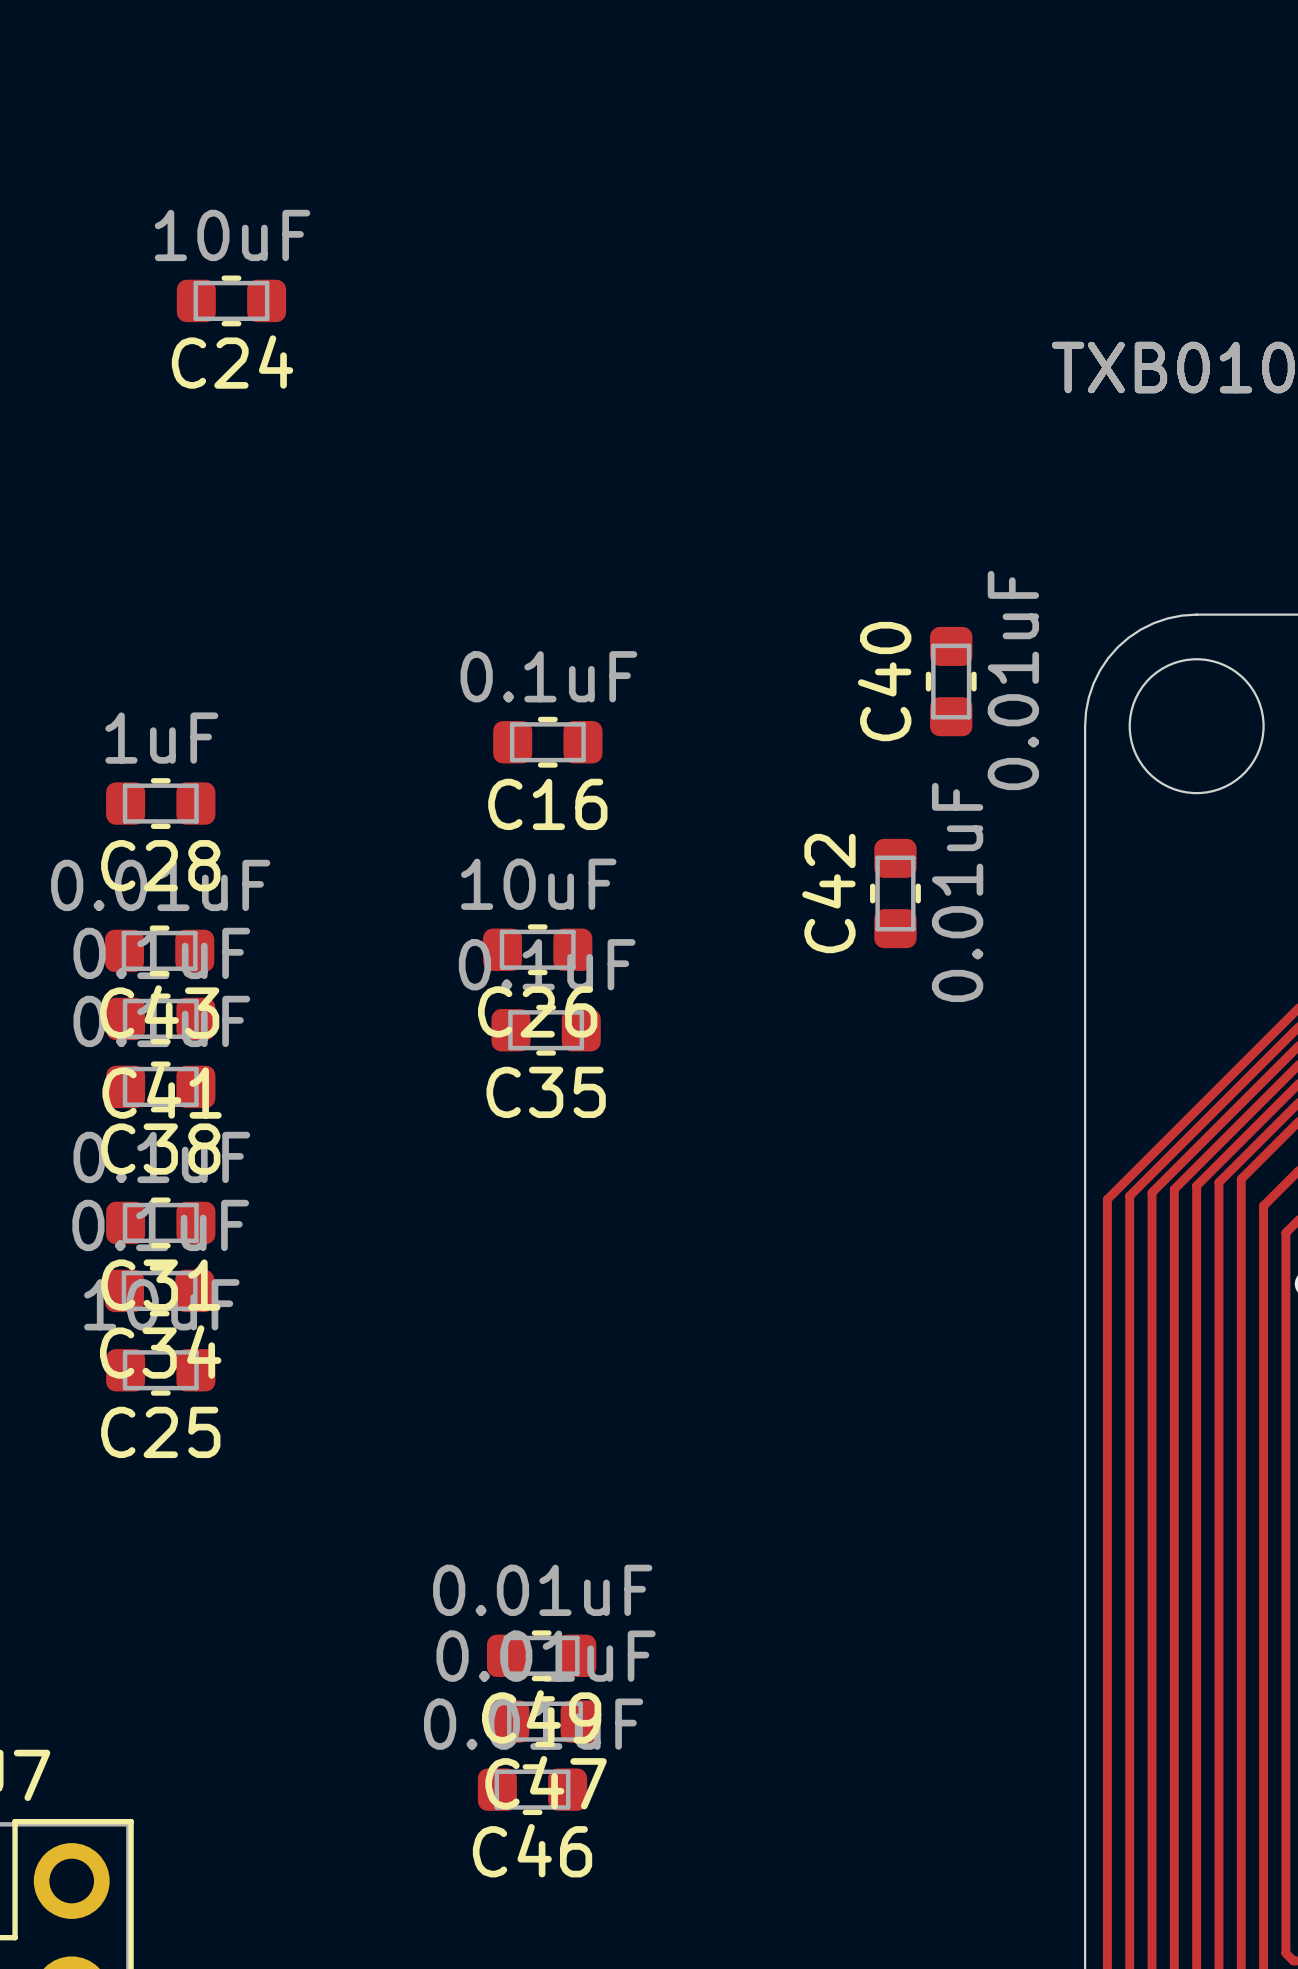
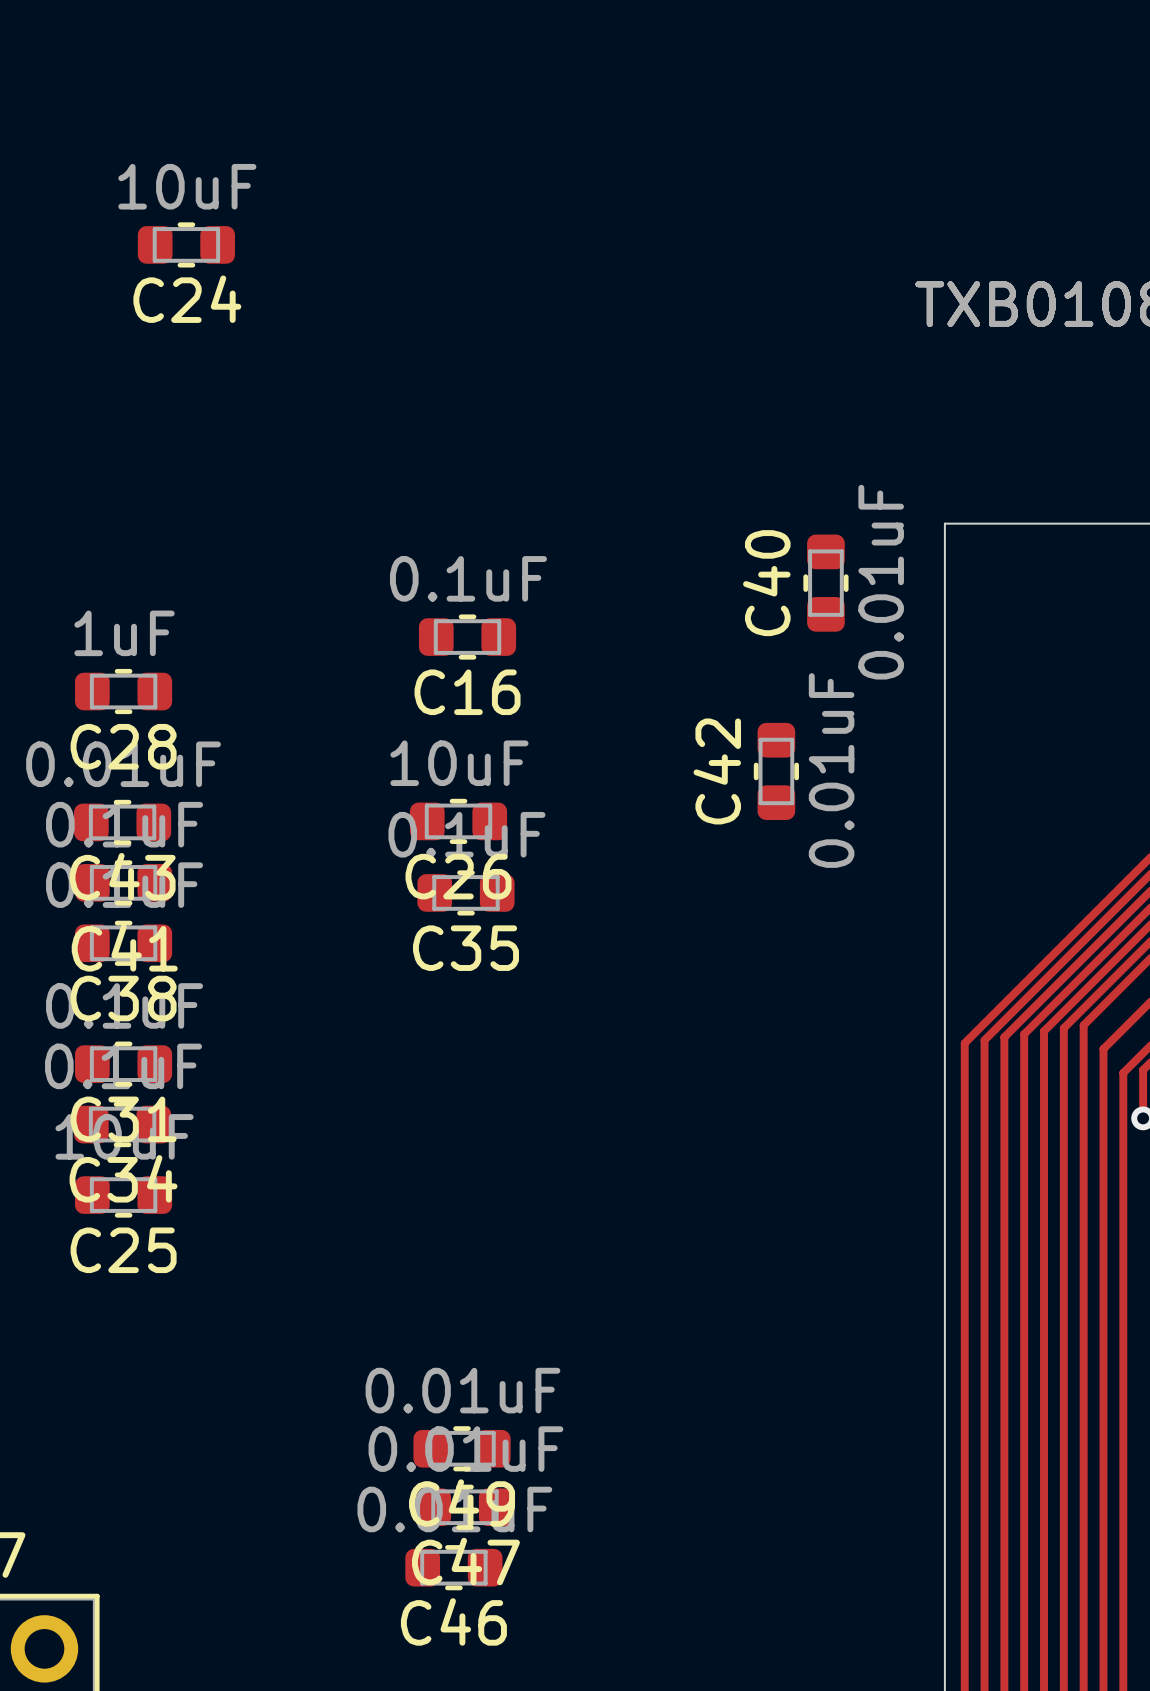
board edge: (1196, 614) (1167, 618) (1153, 623) (1140, 629) (1117, 647) (1100, 670) (1093, 683) (1088, 697) (1085, 726) -> (1044, 523) (944, 523) (944, 622)
round board edge: [1128, 658, 1265, 795] -> none

